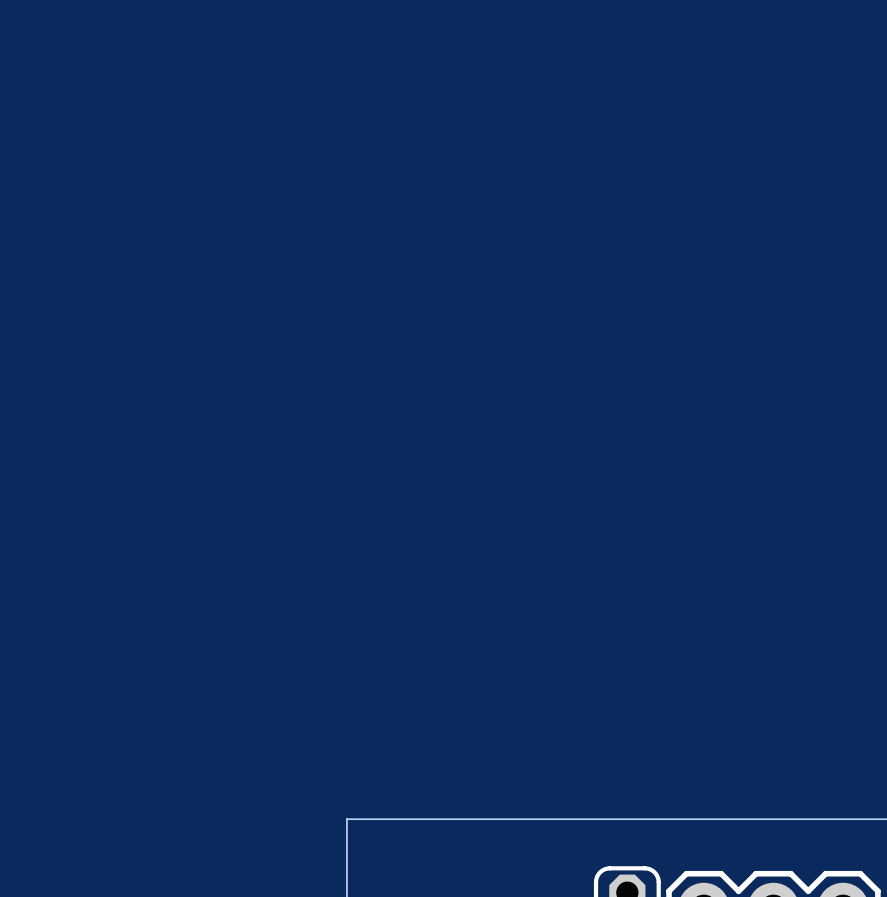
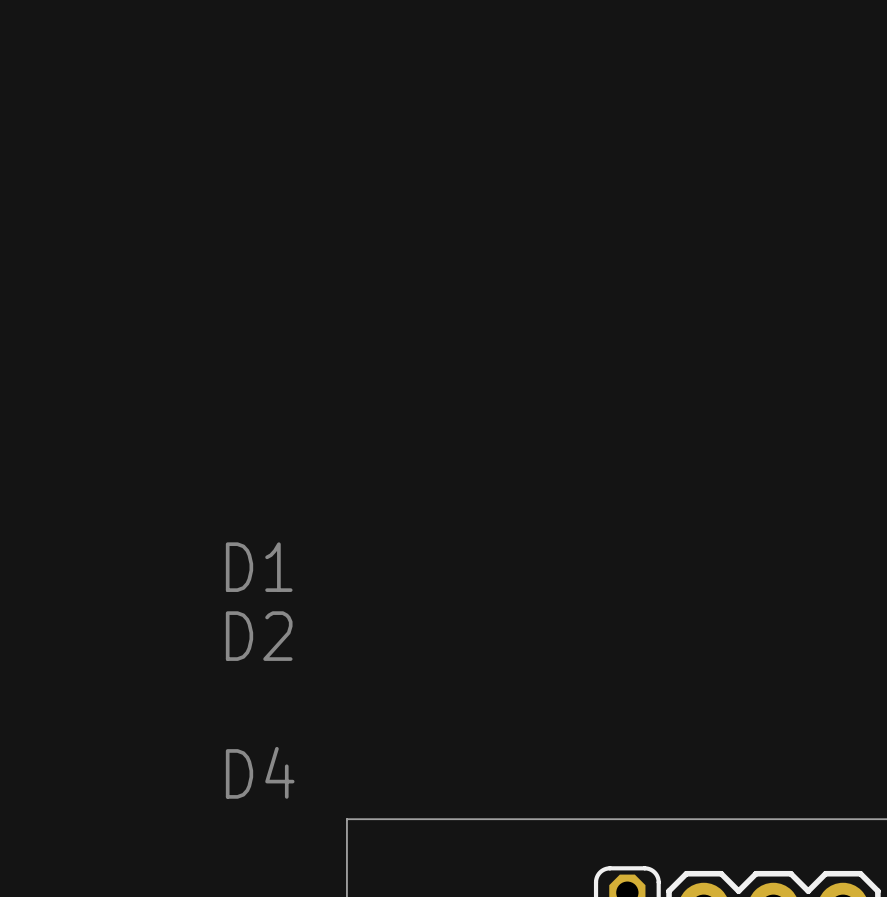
text: none -> D1 (259, 567)
text: none -> D2 (259, 636)
text: none -> D4 (260, 772)

